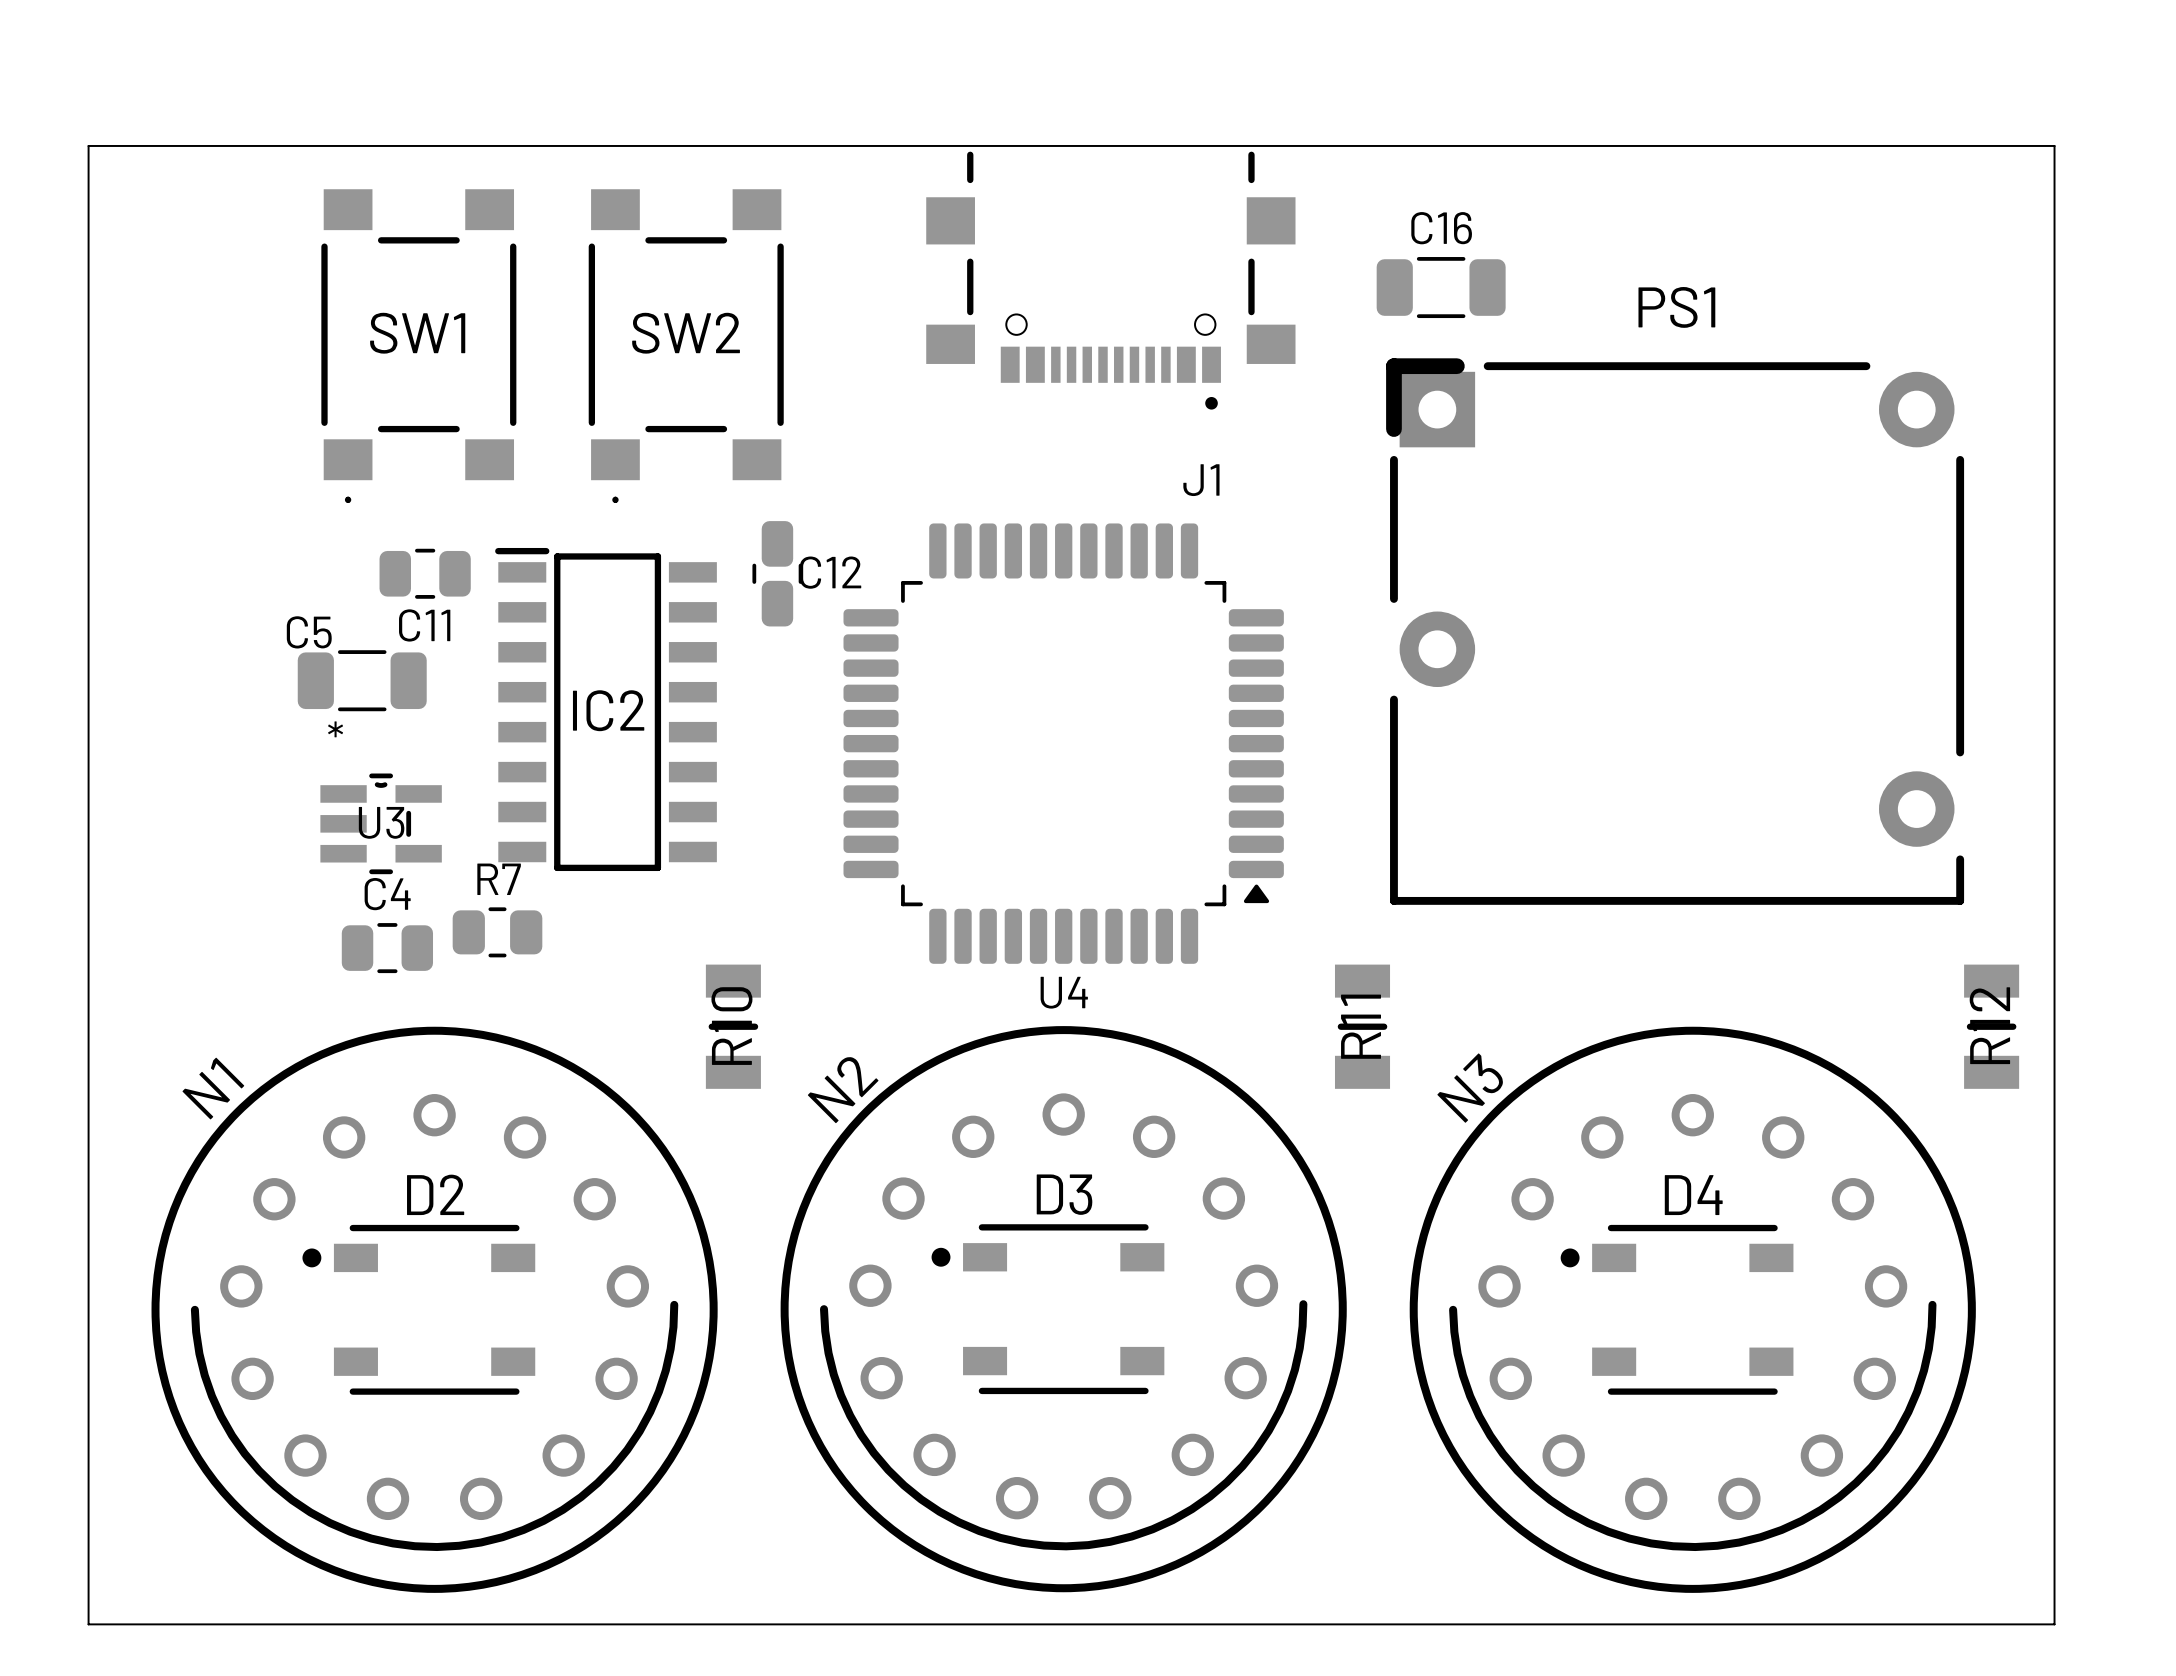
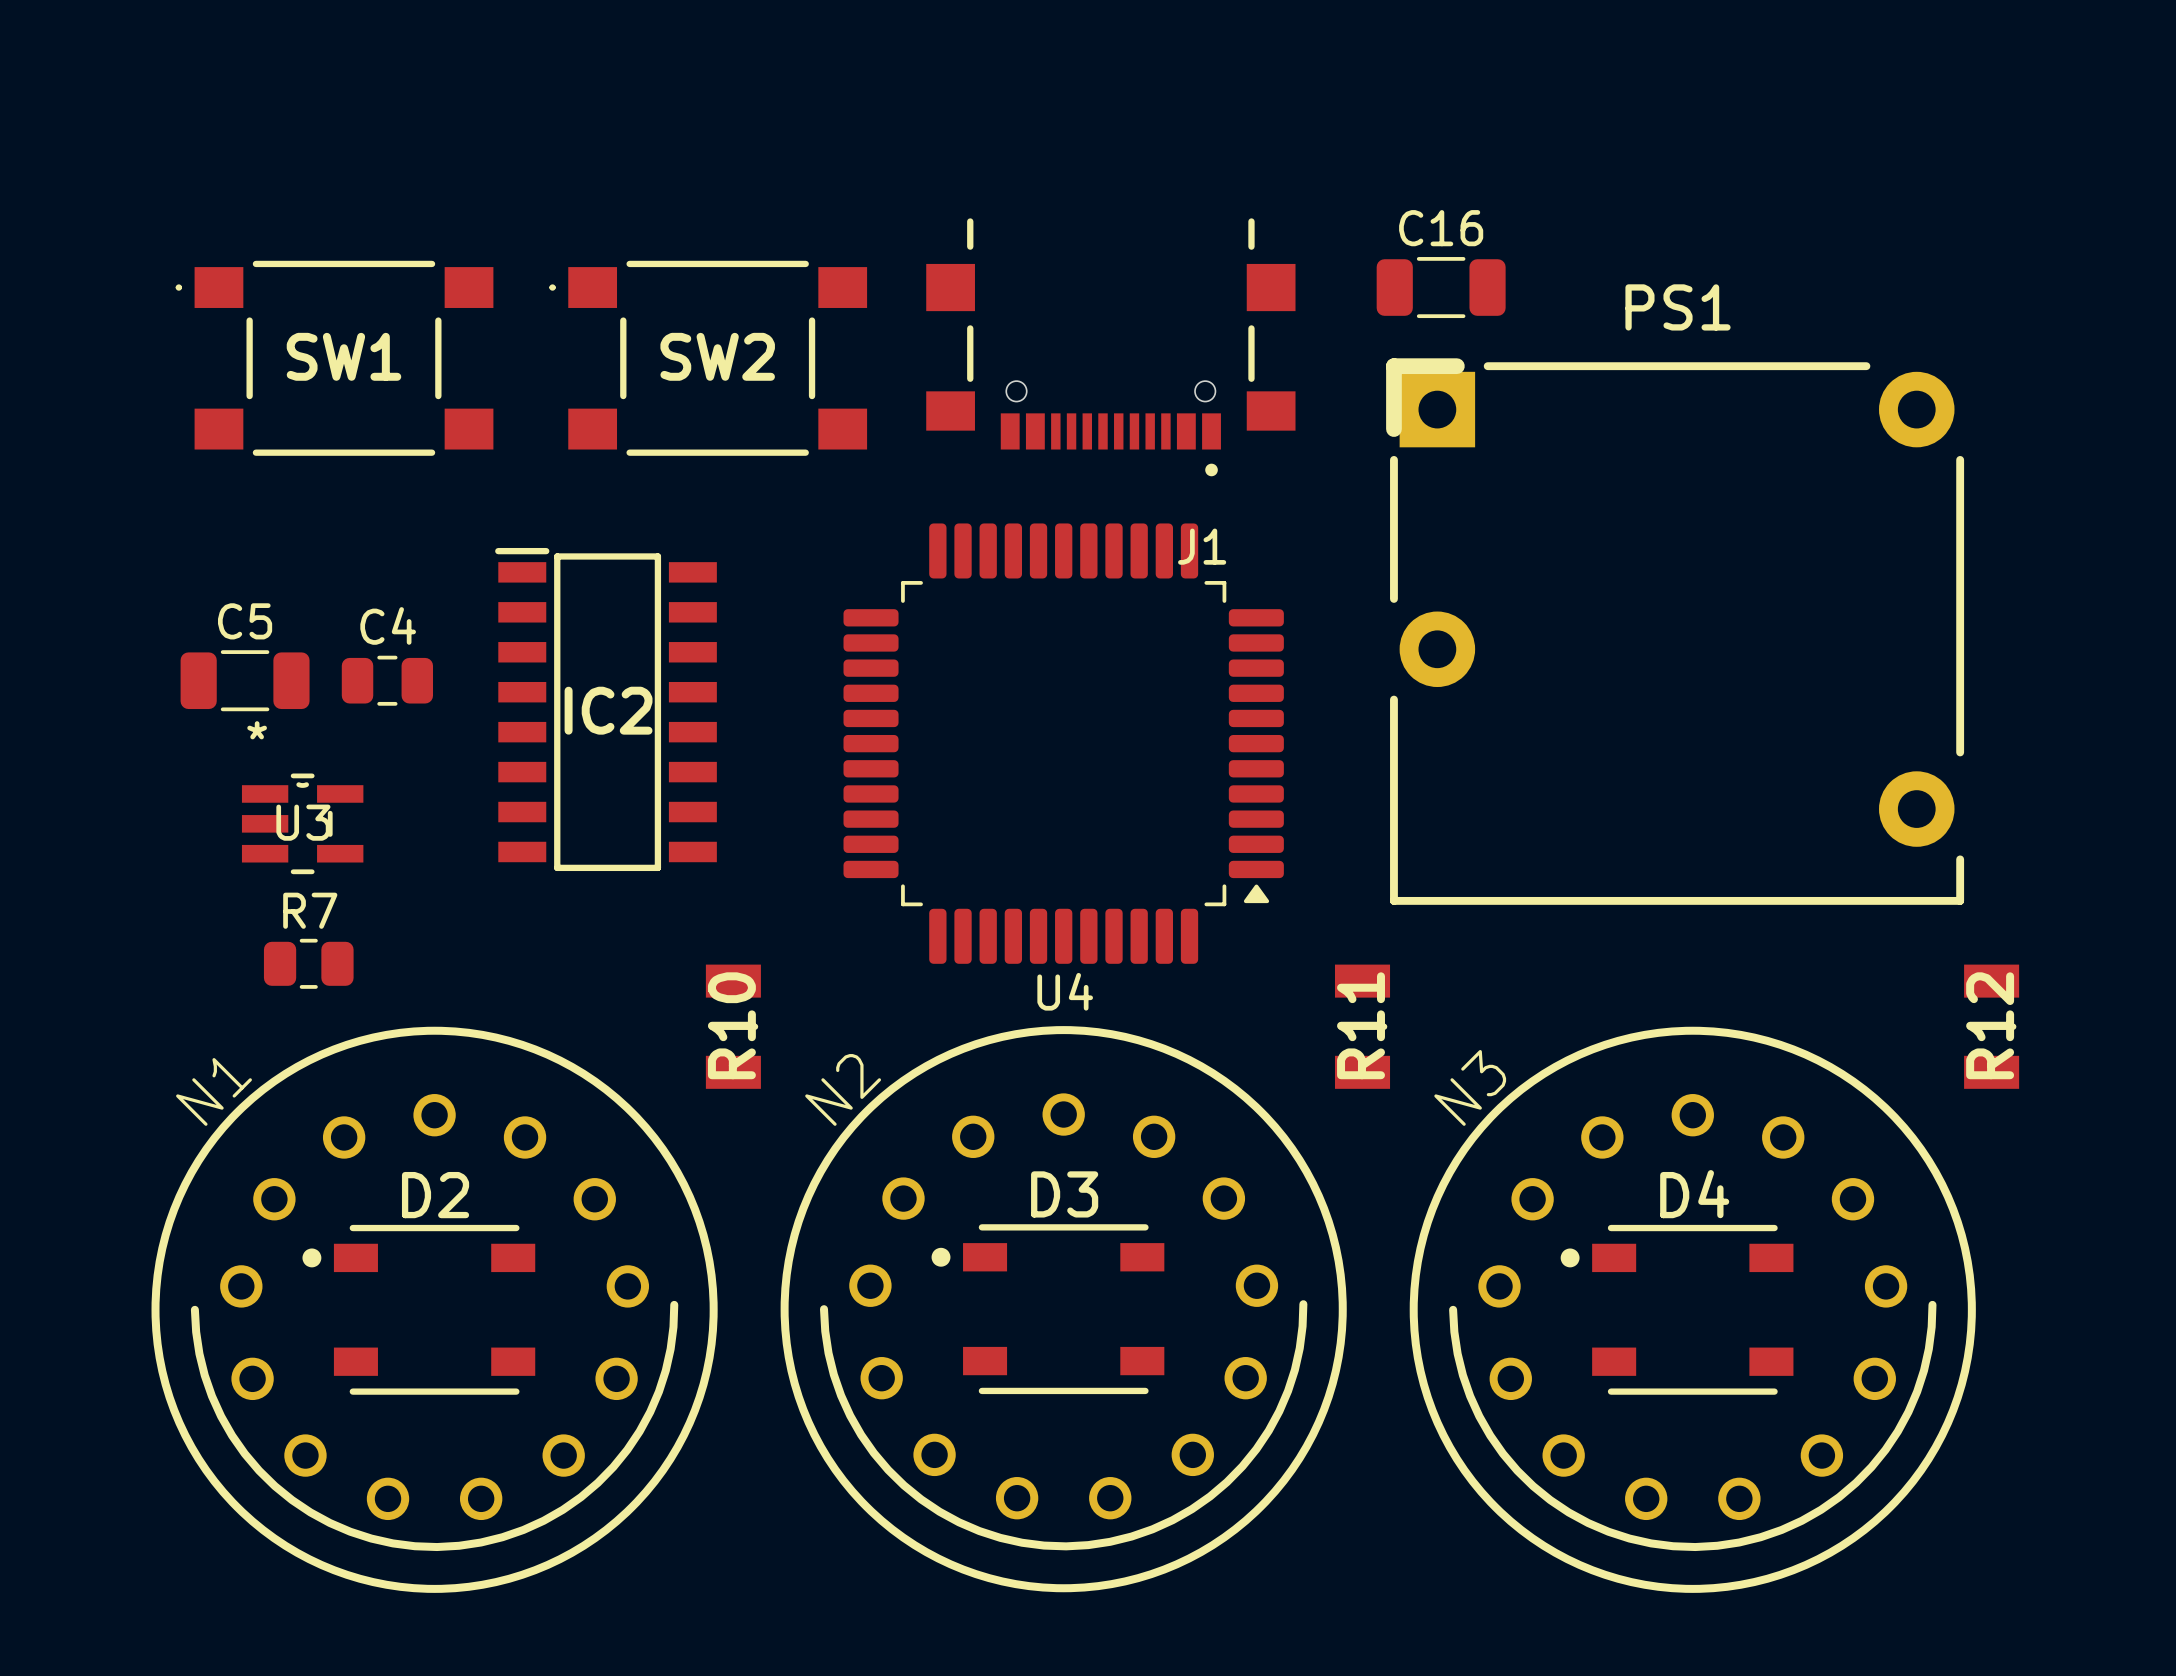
board edge: (88, 145) (2054, 145) (2054, 1624) (88, 1624) (88, 145) -> none
SW1 footprint: [321, 189, 517, 504] -> [175, 260, 494, 456]
SW2 footprint: [588, 189, 784, 504] -> [549, 260, 868, 456]
J1 position: (1110, 280) -> (1110, 347)
C11: (425, 573) -> none
C12: (777, 573) -> none
C5 name position: C5 (309, 632) -> C5 (245, 621)
C5 position: (362, 680) -> (245, 680)
U3 position: (381, 823) -> (302, 823)
R7 position: (497, 932) -> (308, 963)
C4 position: (387, 948) -> (387, 680)

